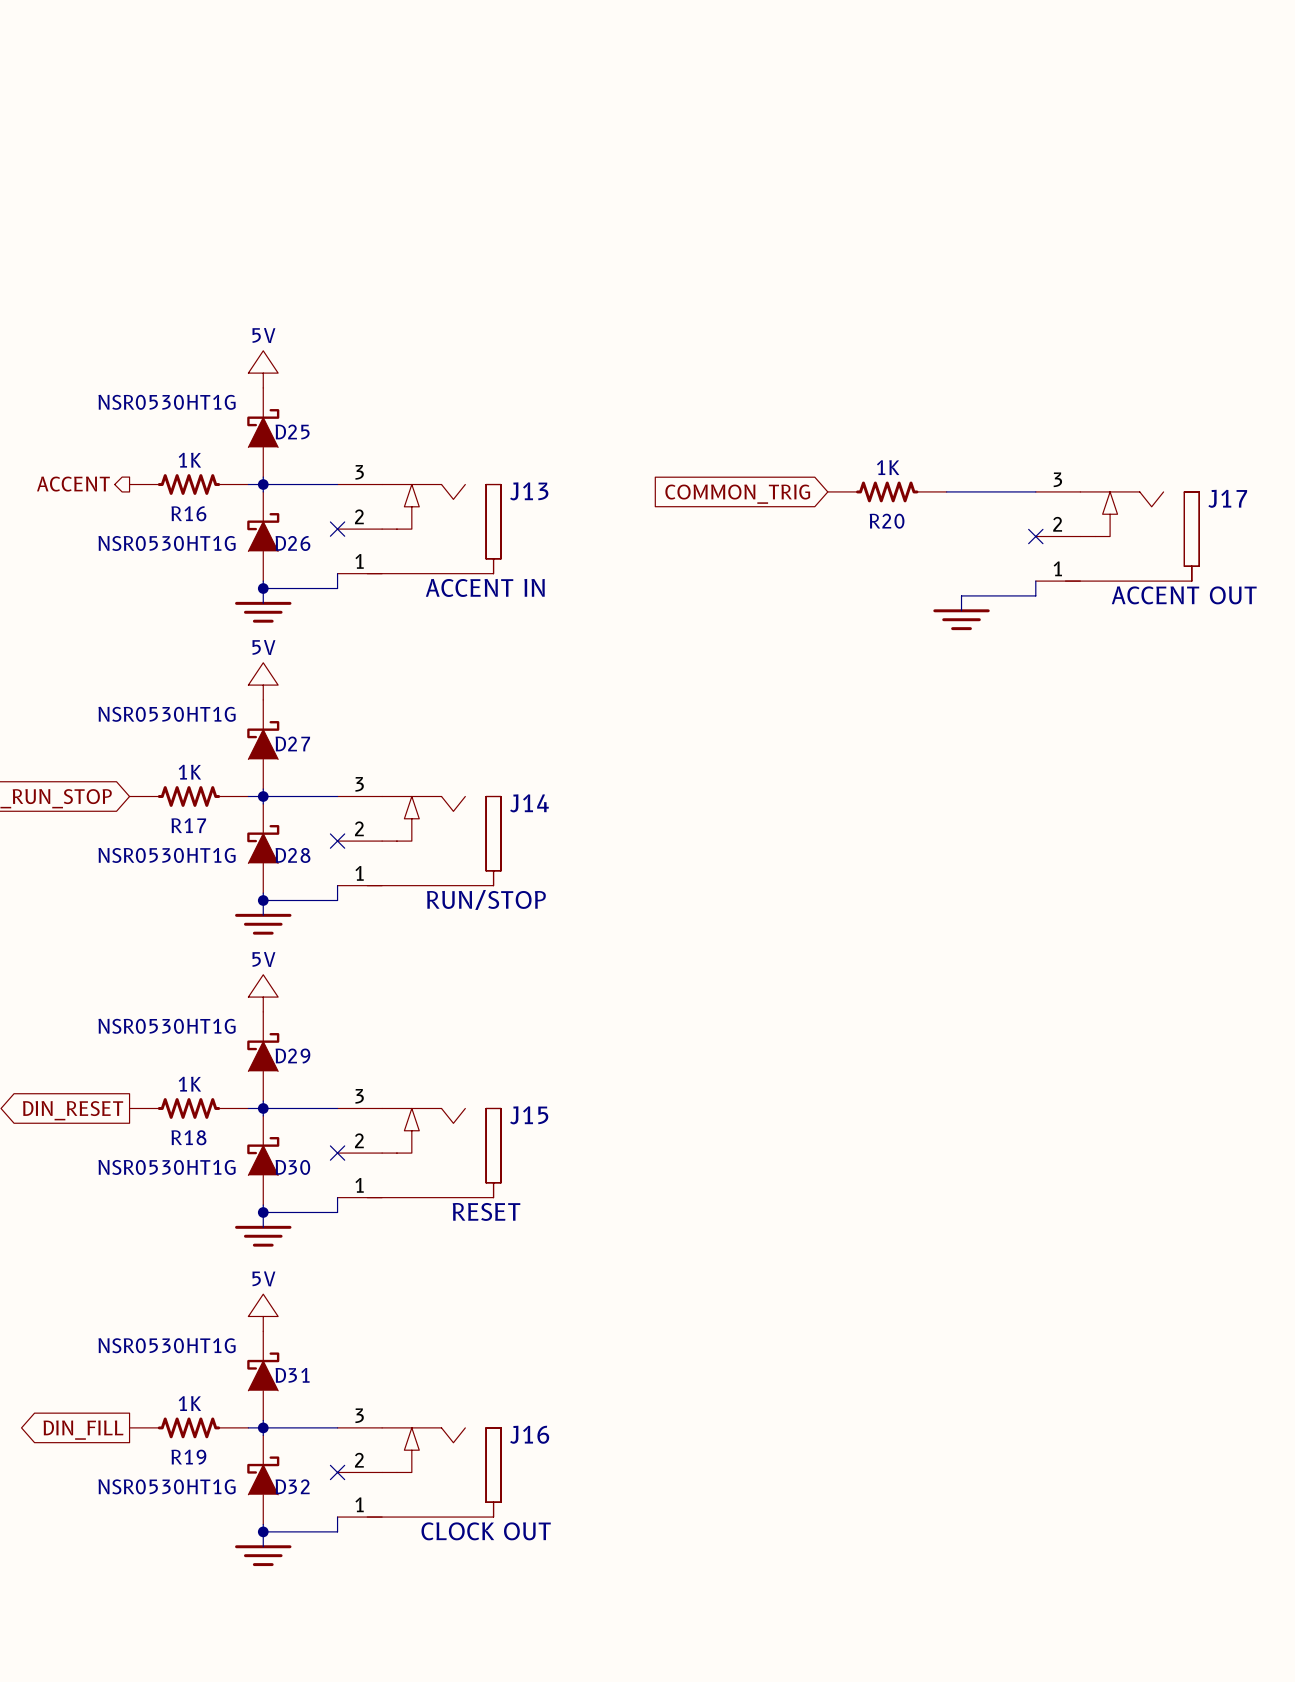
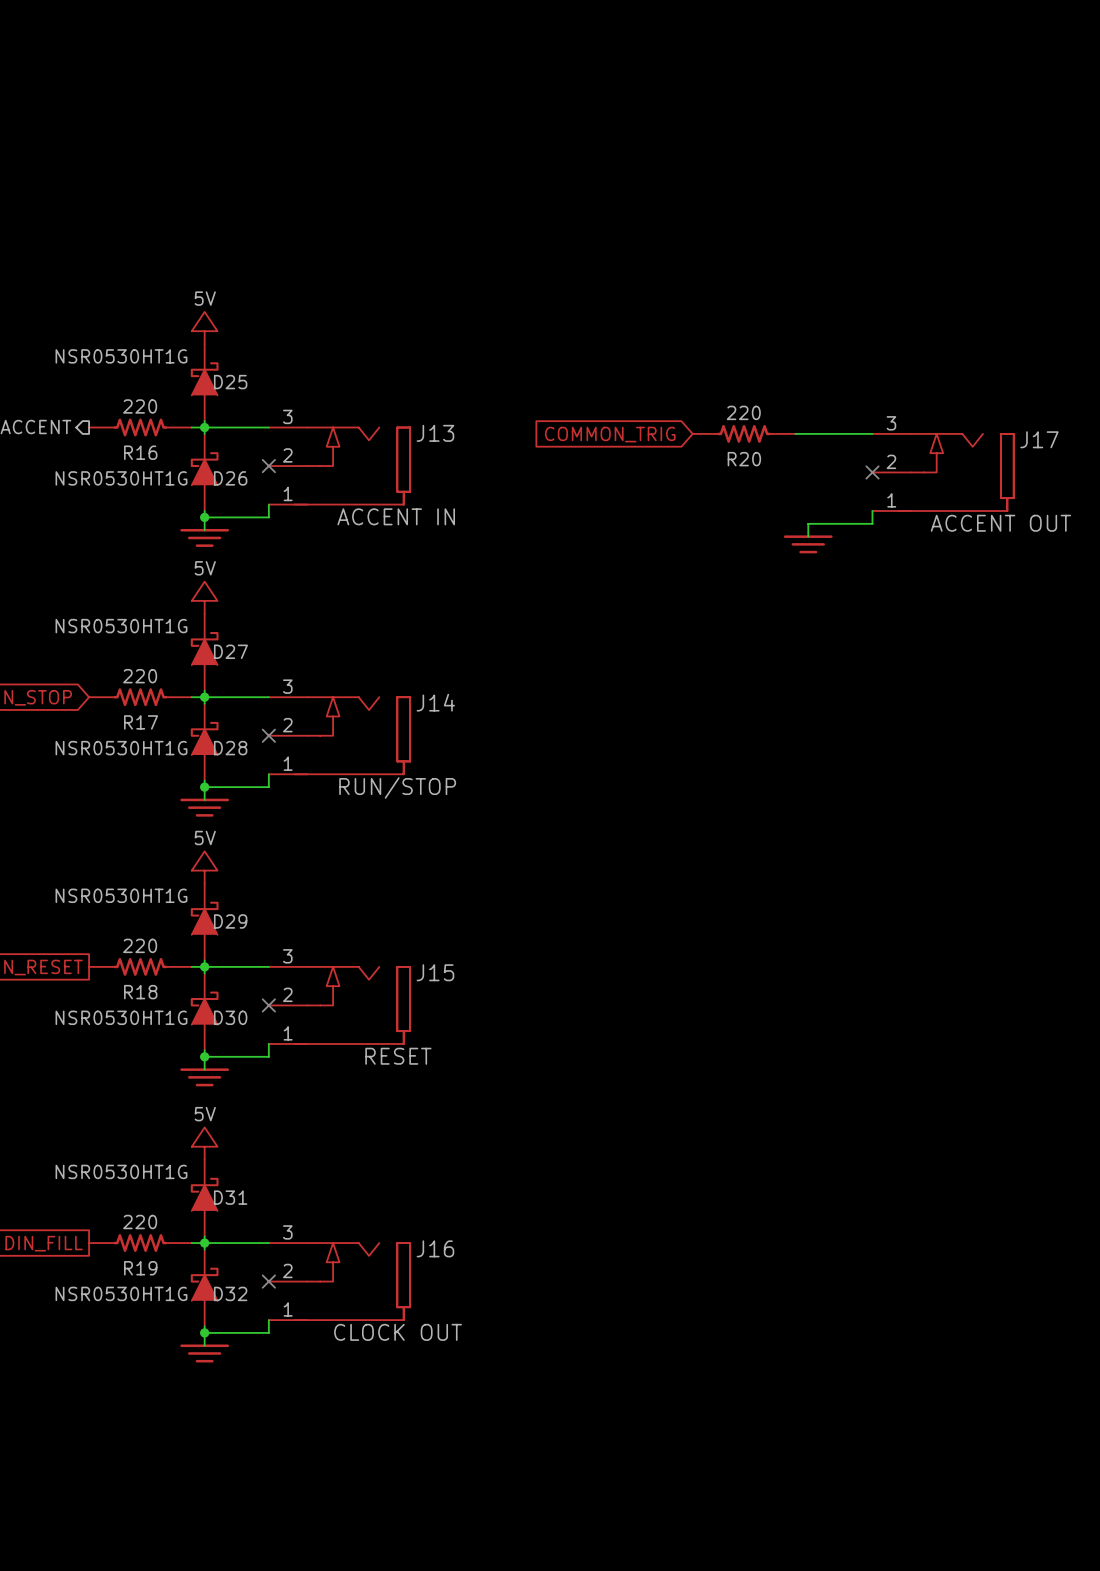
R16 value: 1K (189, 460) -> 220 (140, 406)
R20 value: 1K (888, 467) -> 220 (743, 412)
R17 value: 1K (189, 772) -> 220 (140, 676)
R18 value: 1K (189, 1084) -> 220 (140, 945)
R19 value: 1K (189, 1403) -> 220 (140, 1222)

